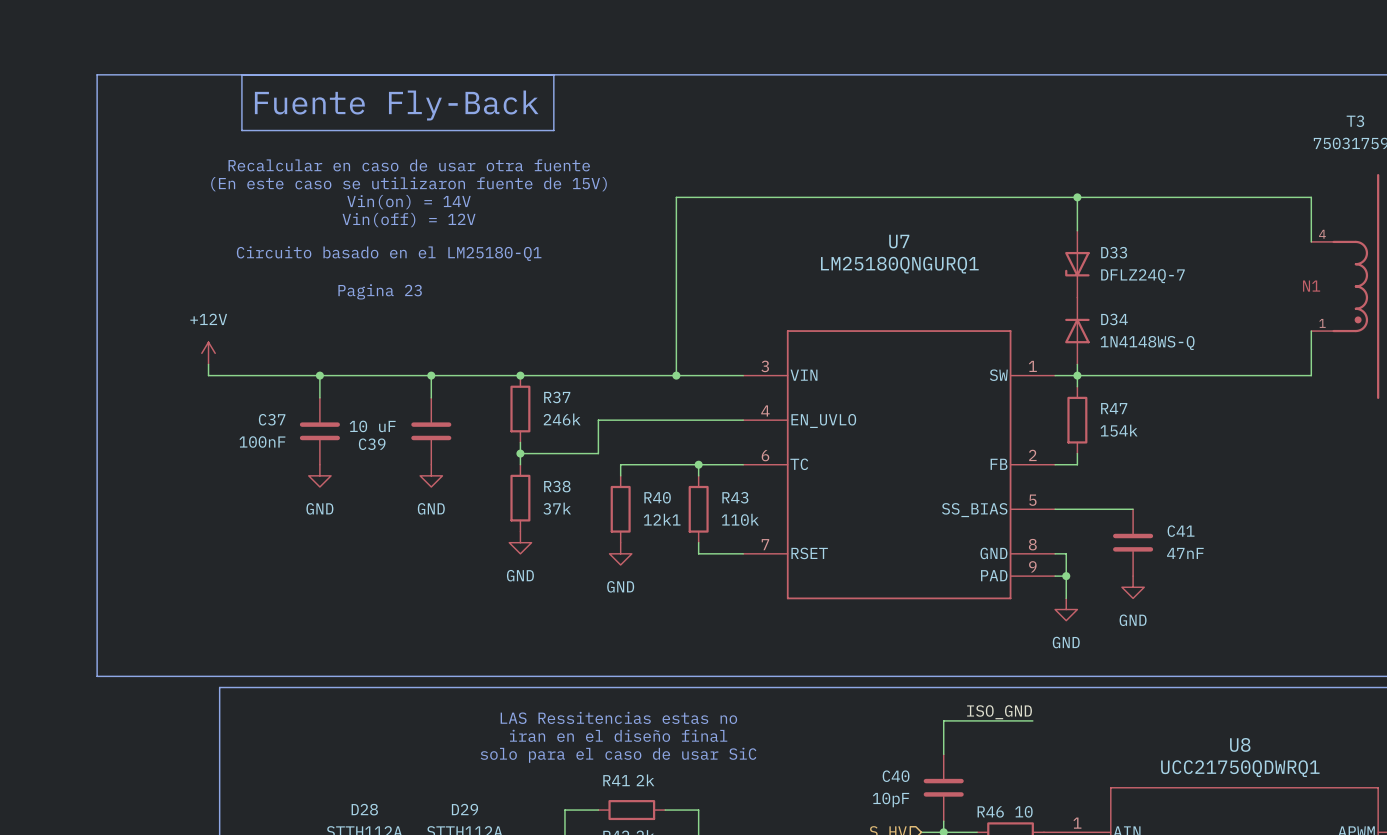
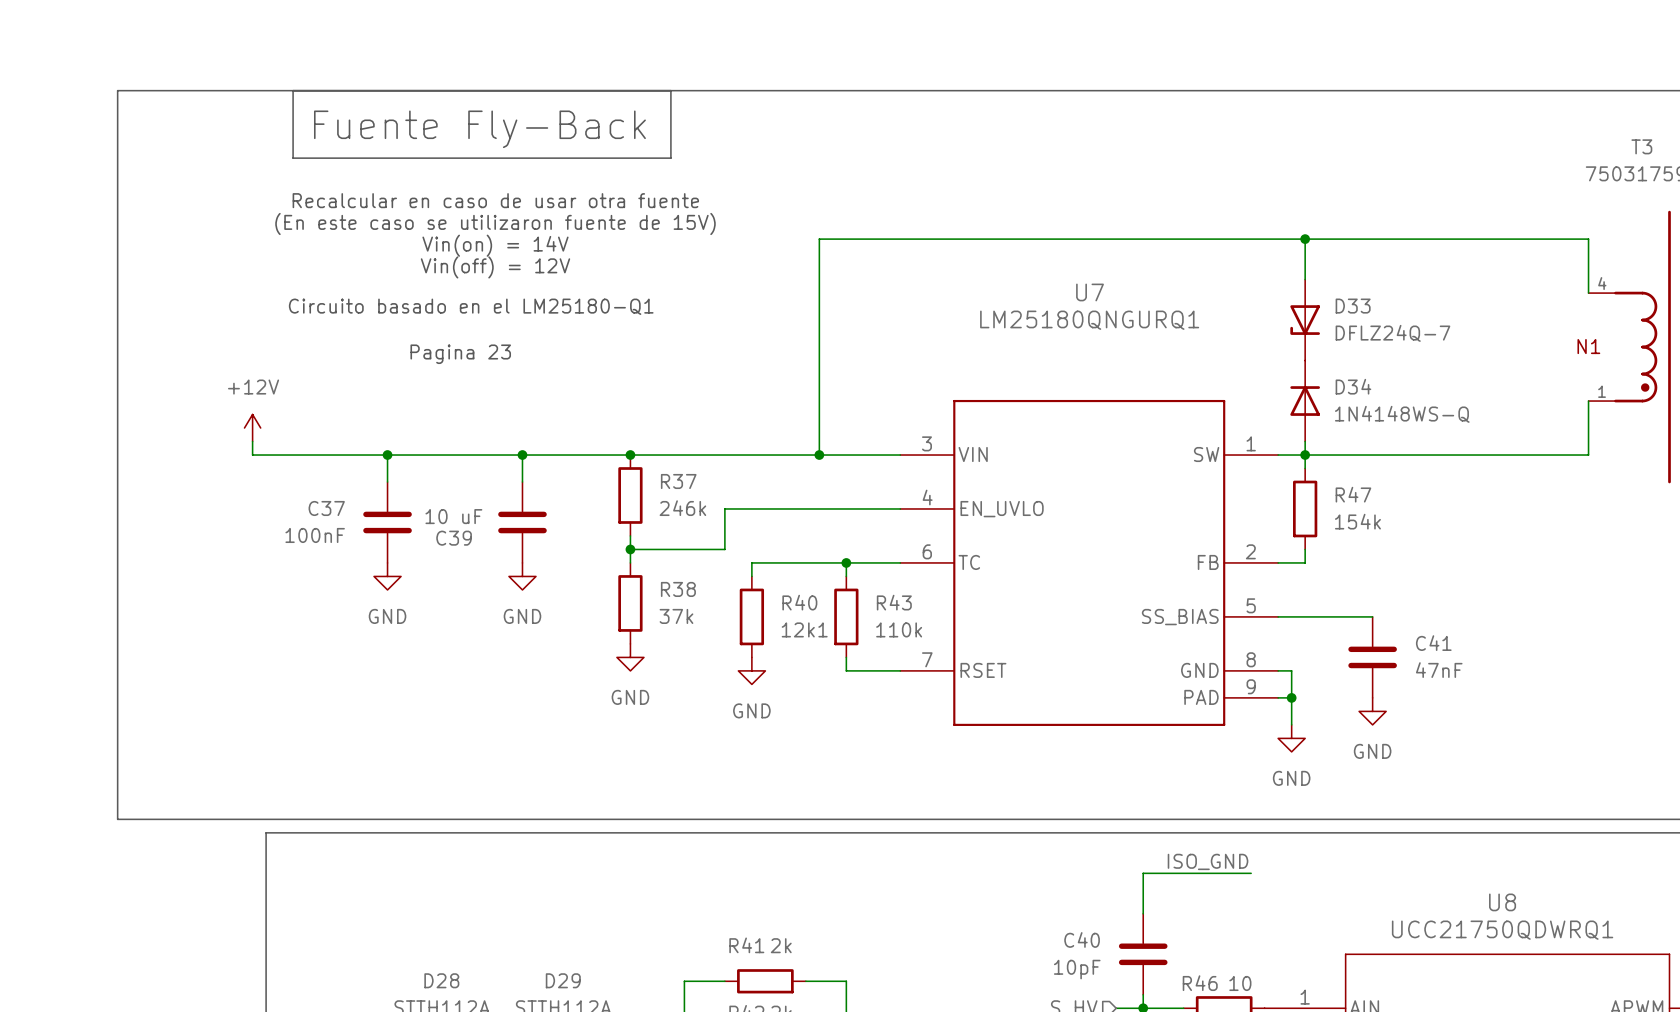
text: LAS Ressitencias estas no (618, 717) -> none
text: iran en el diseño final (618, 735) -> none
text: solo para el caso de usar SiC (618, 755) -> none

